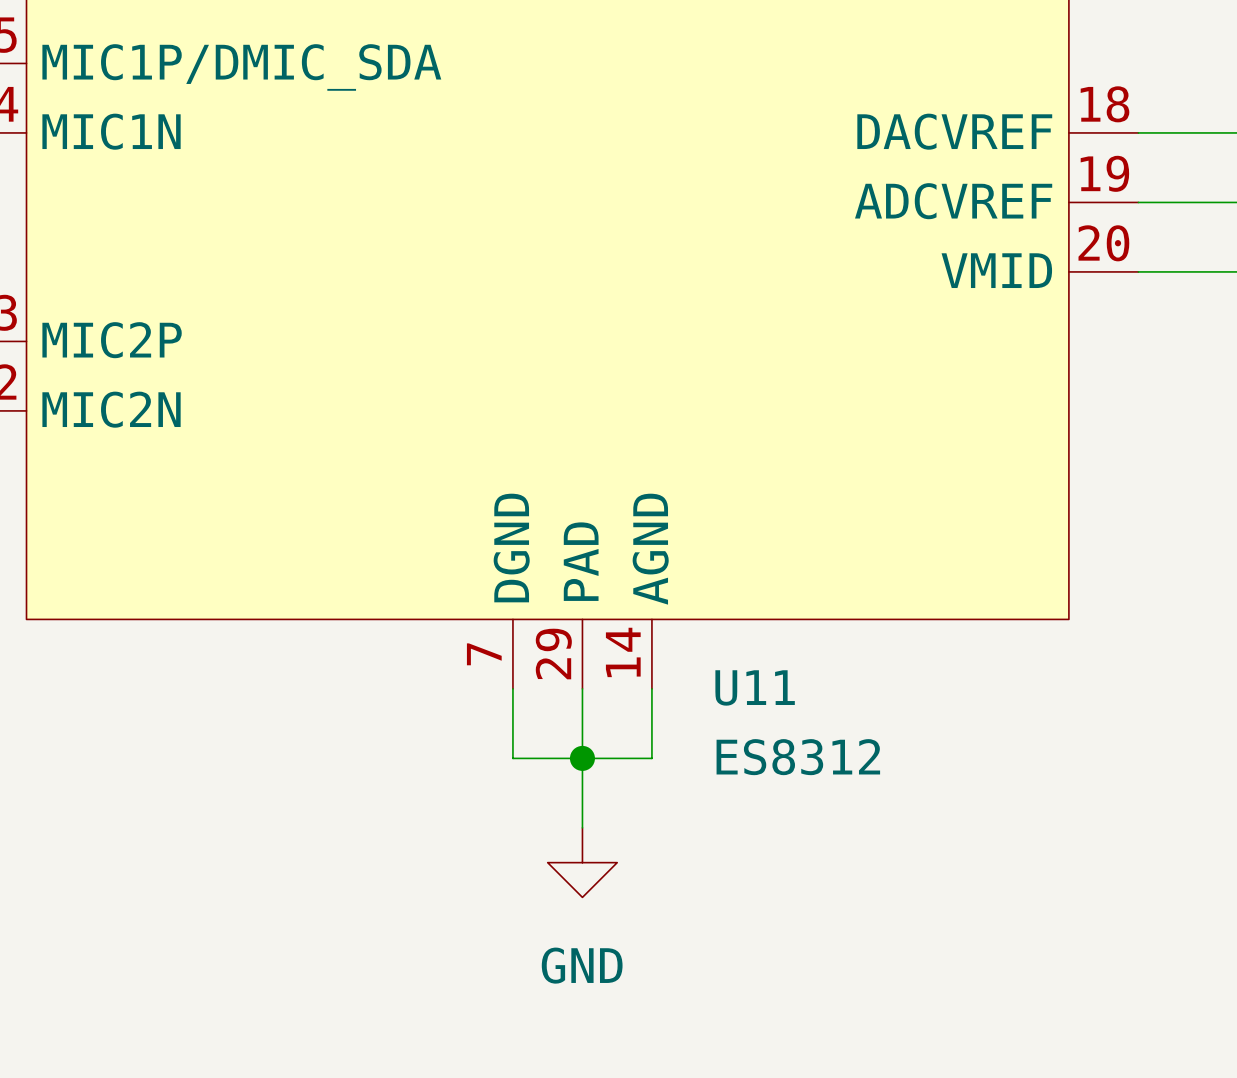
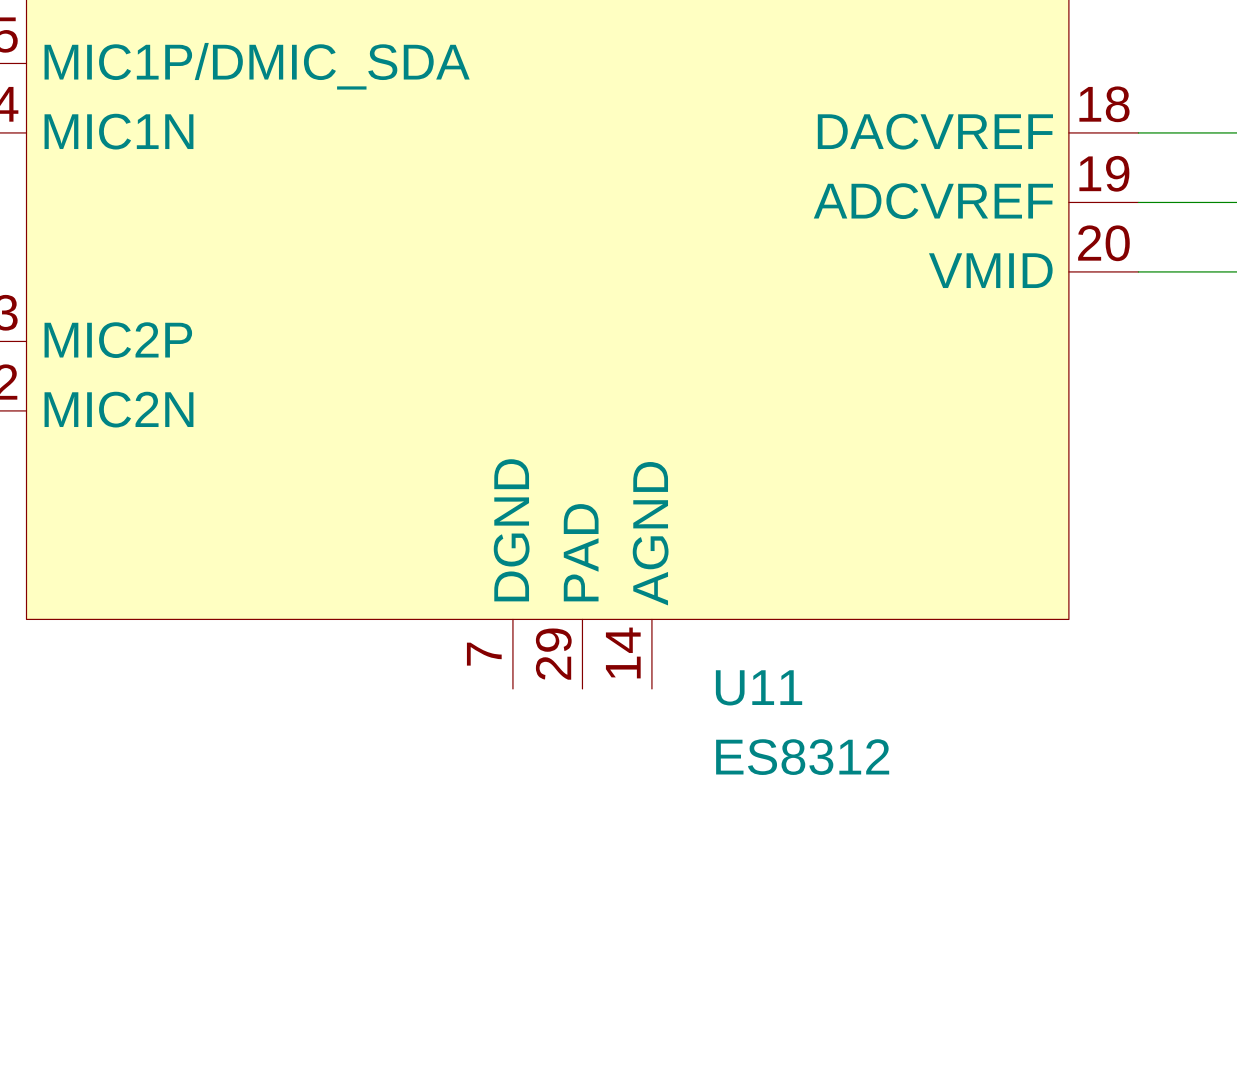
wire: (512, 688) (512, 758) (651, 758) (651, 688) -> none
wire: (582, 688) (582, 827) -> none
junction: (582, 758) -> none
power symbol: GND (582, 862) -> none

